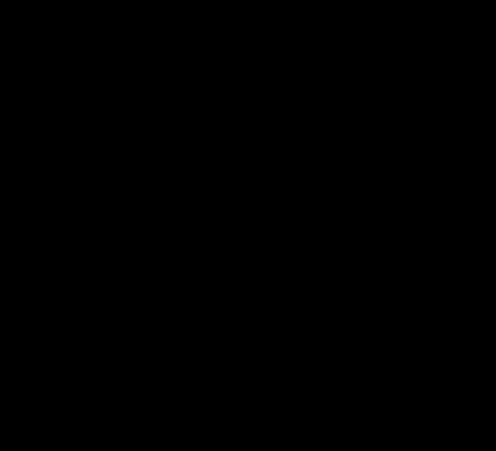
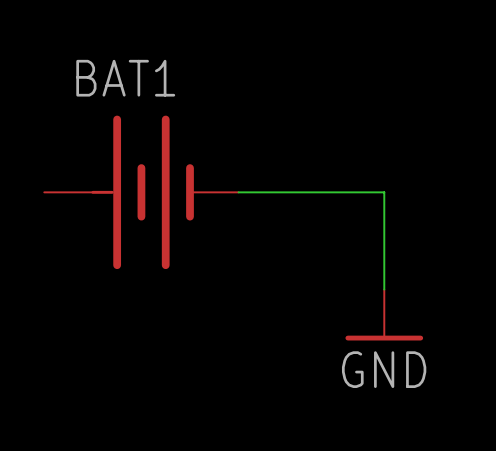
BAT1: none -> (141, 192)
wire: none -> (238, 192) (384, 192) (384, 289)
power symbol: none -> GND (384, 314)

